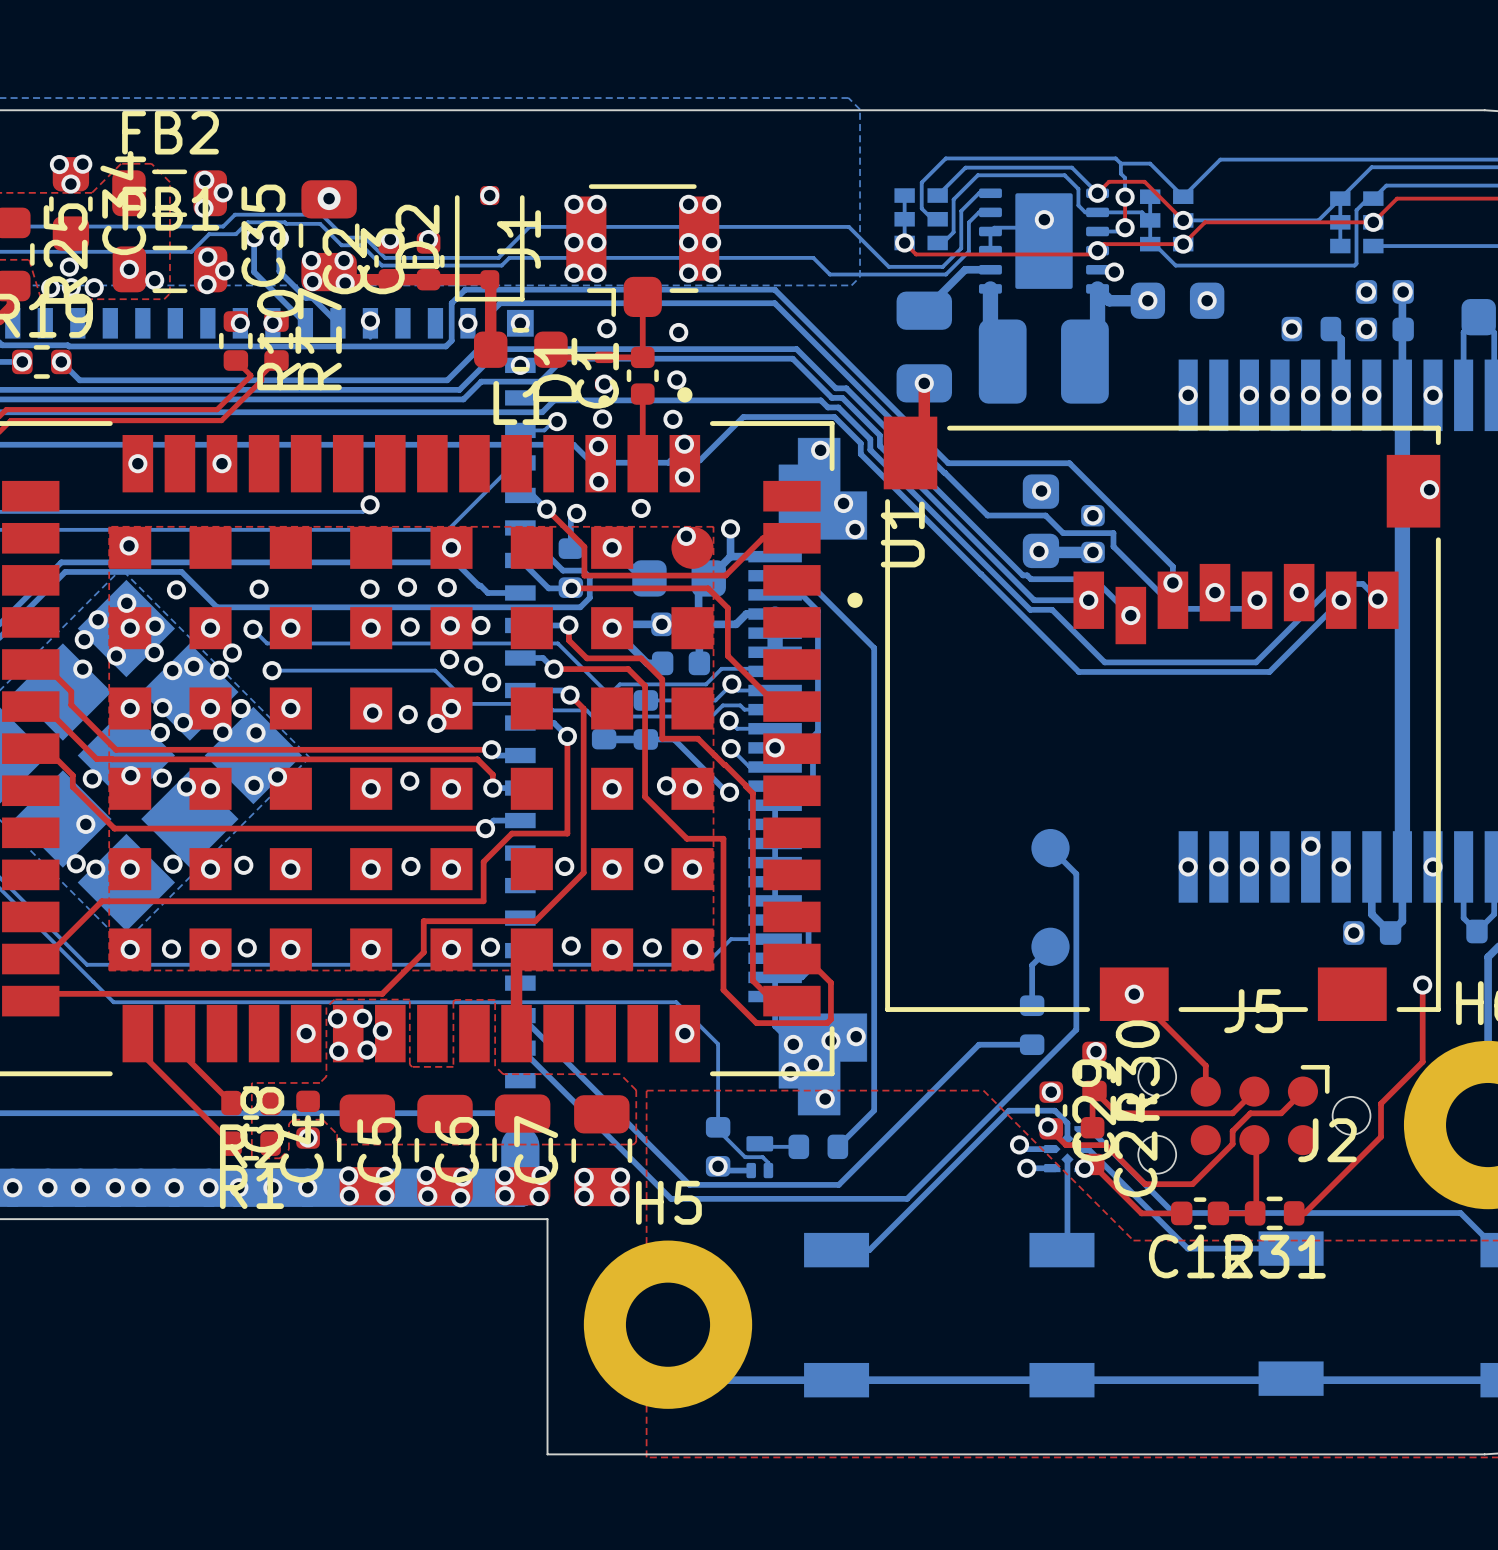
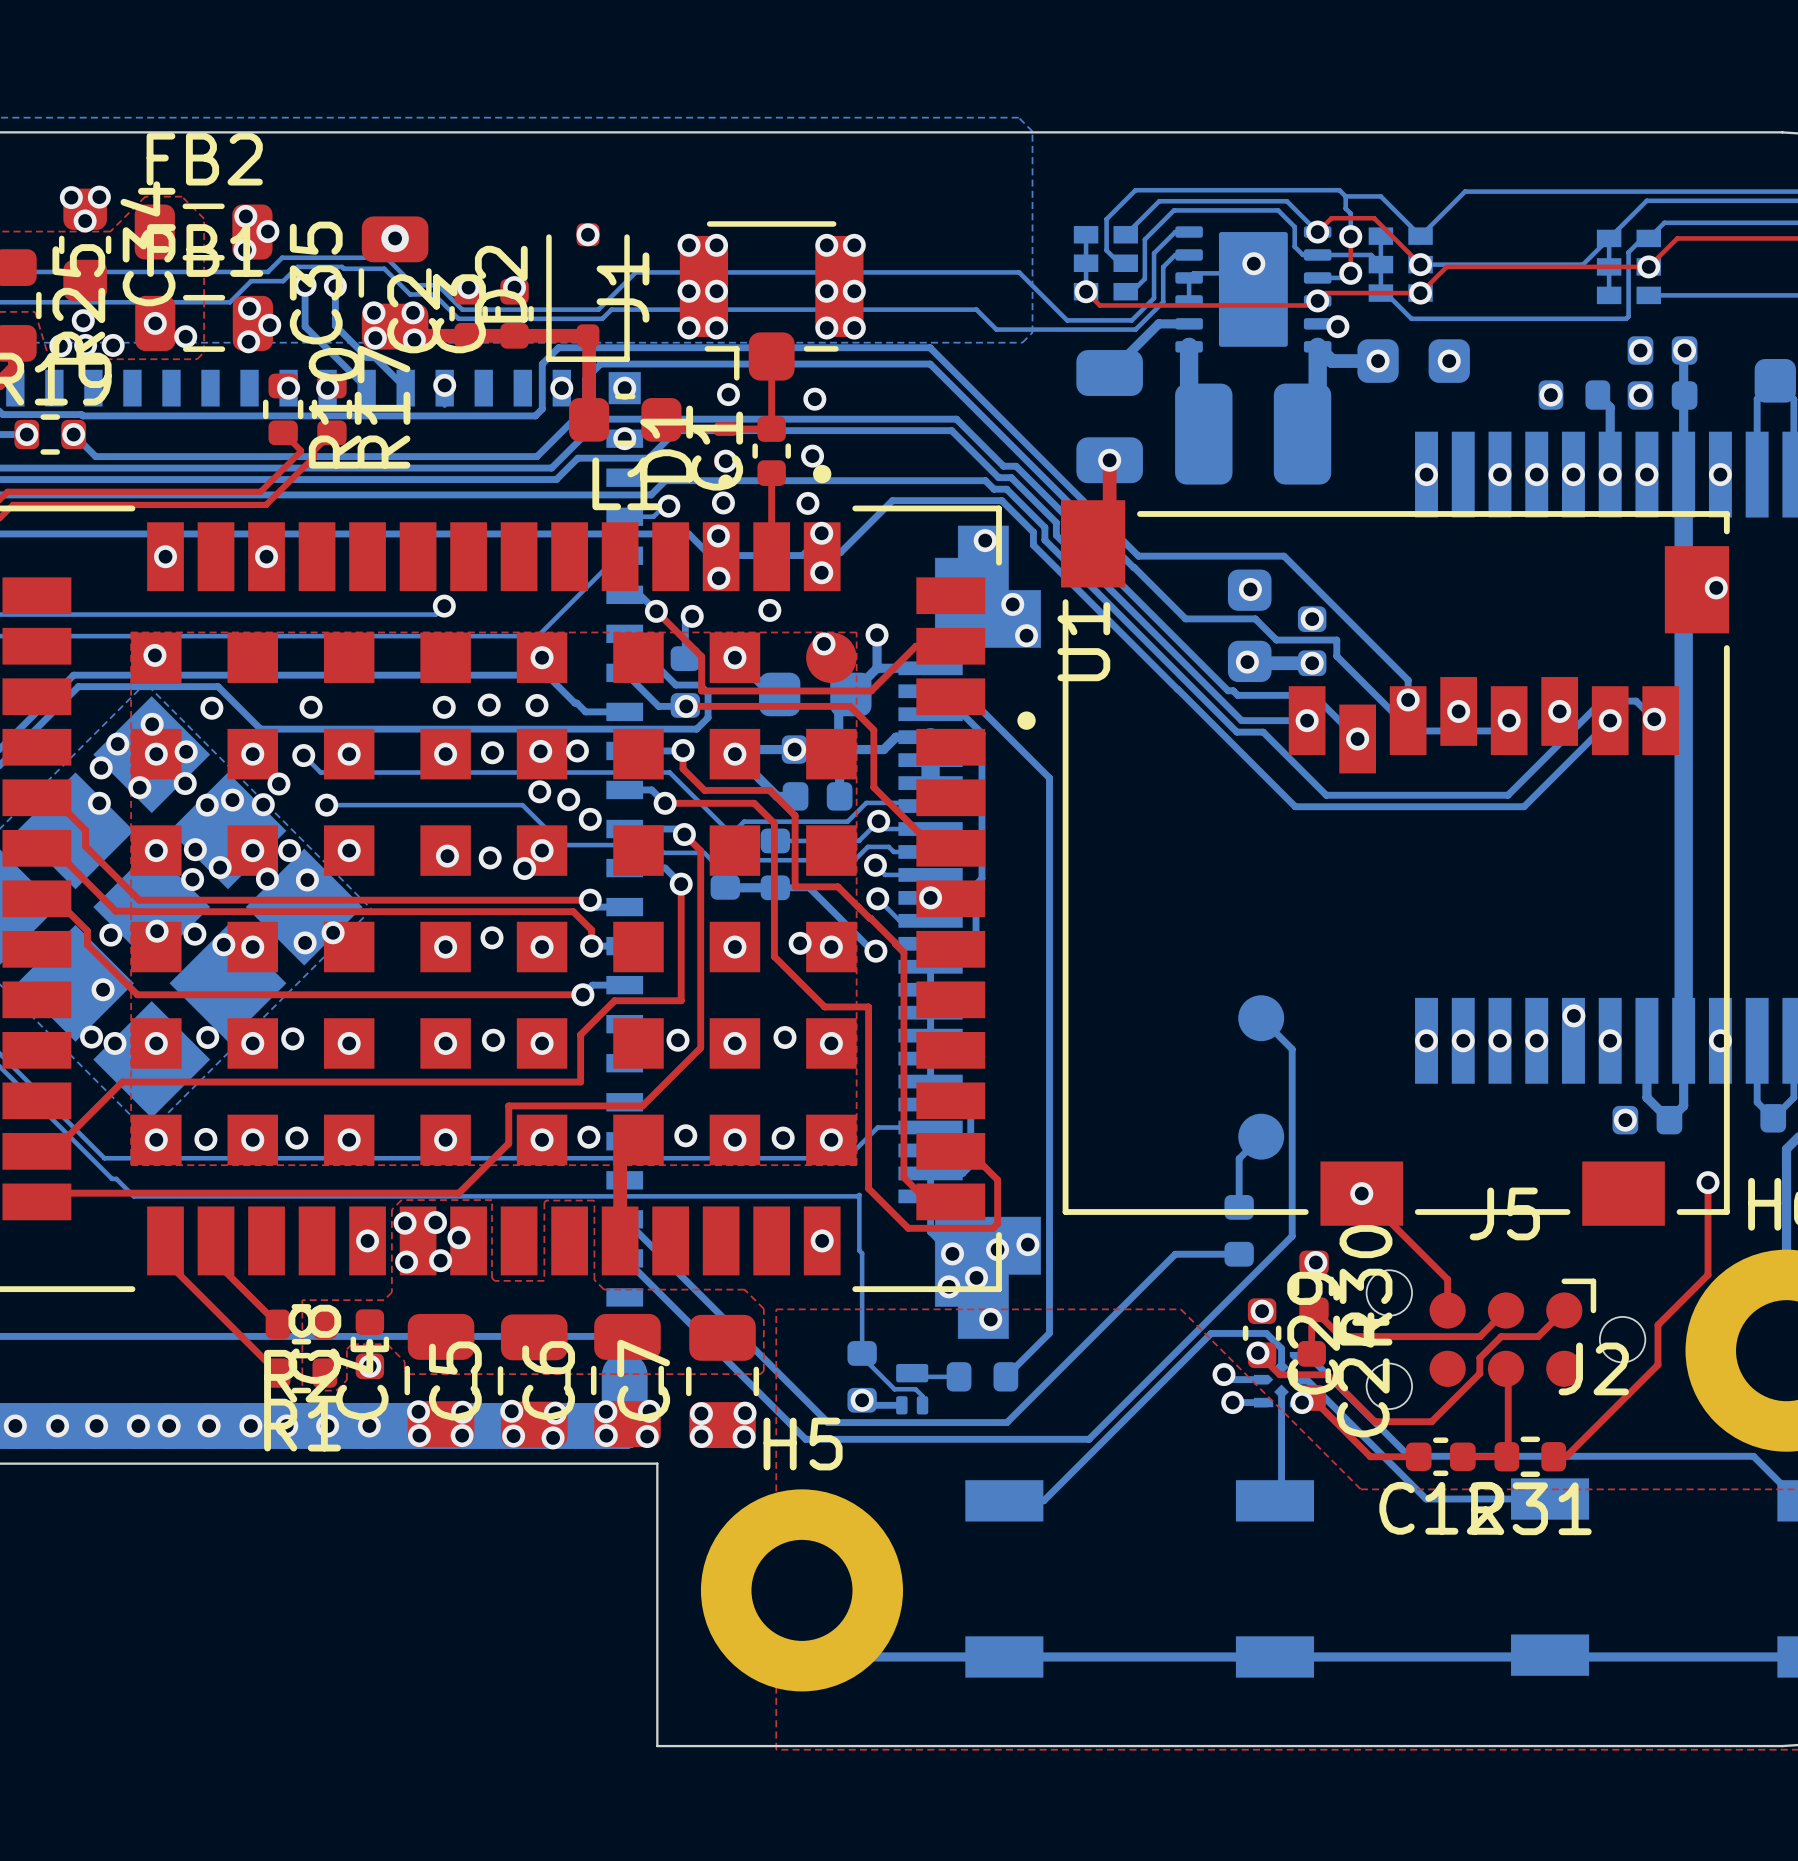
bottom track: (93, 981) (113, 1002) (676, 1002) (715, 1041) -> (112, 1178) (116, 1178) (133, 1196) (859, 1195) (859, 1250)

